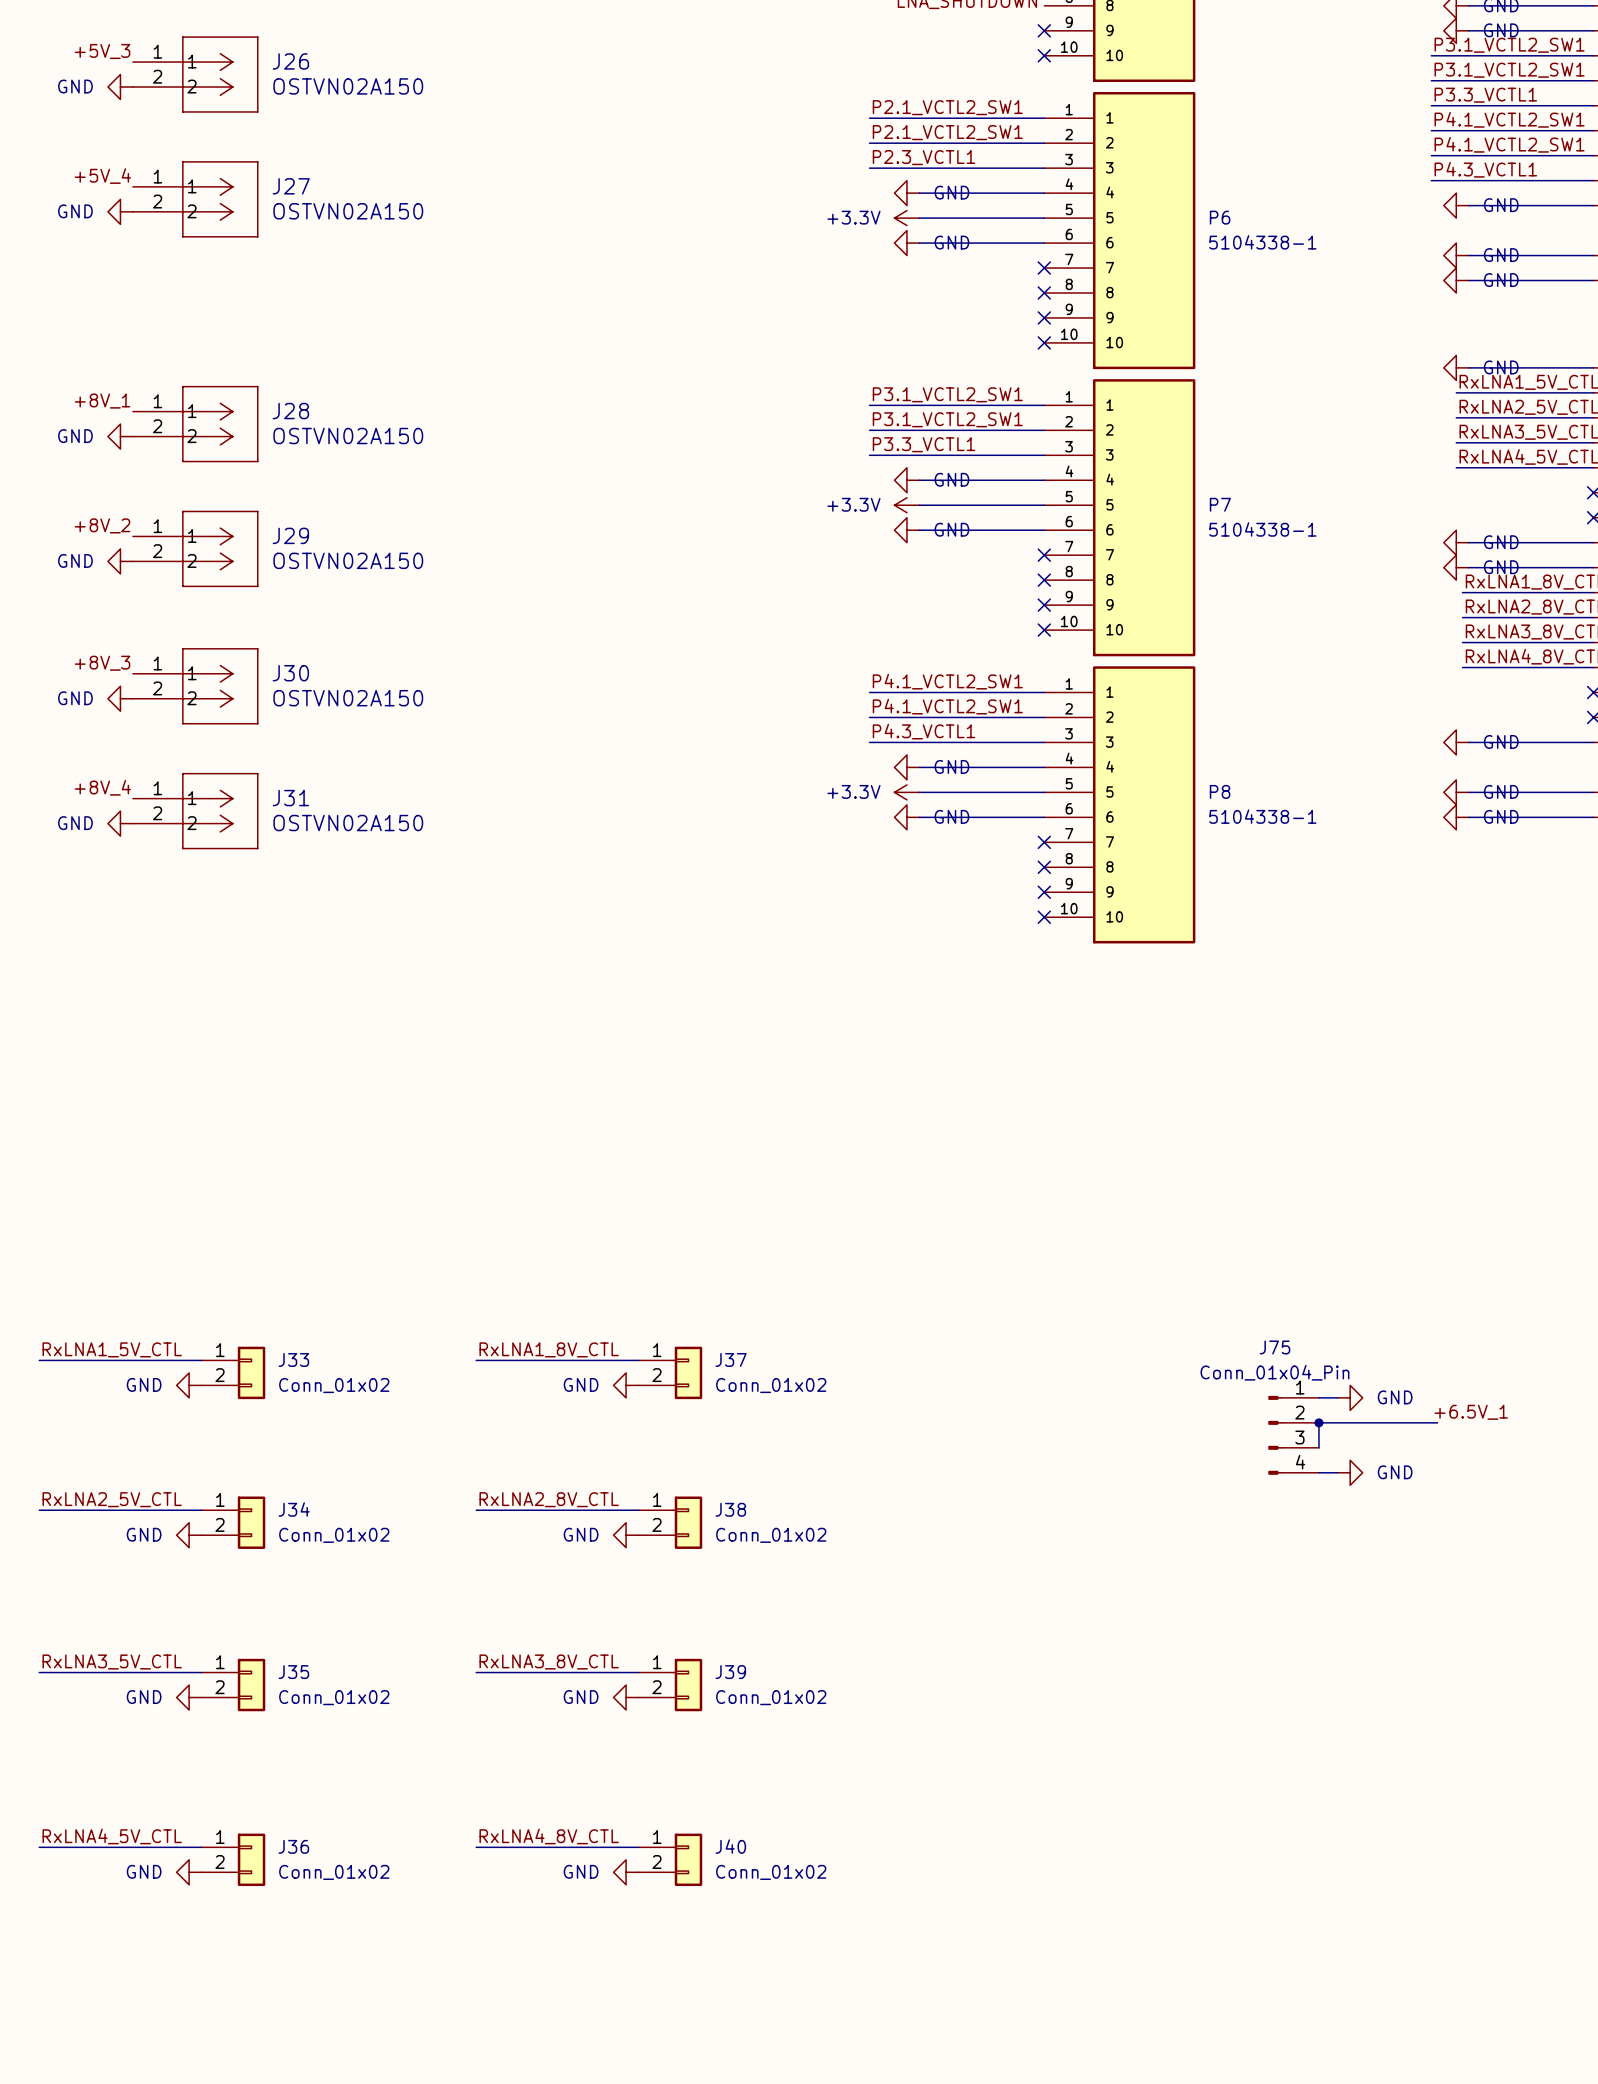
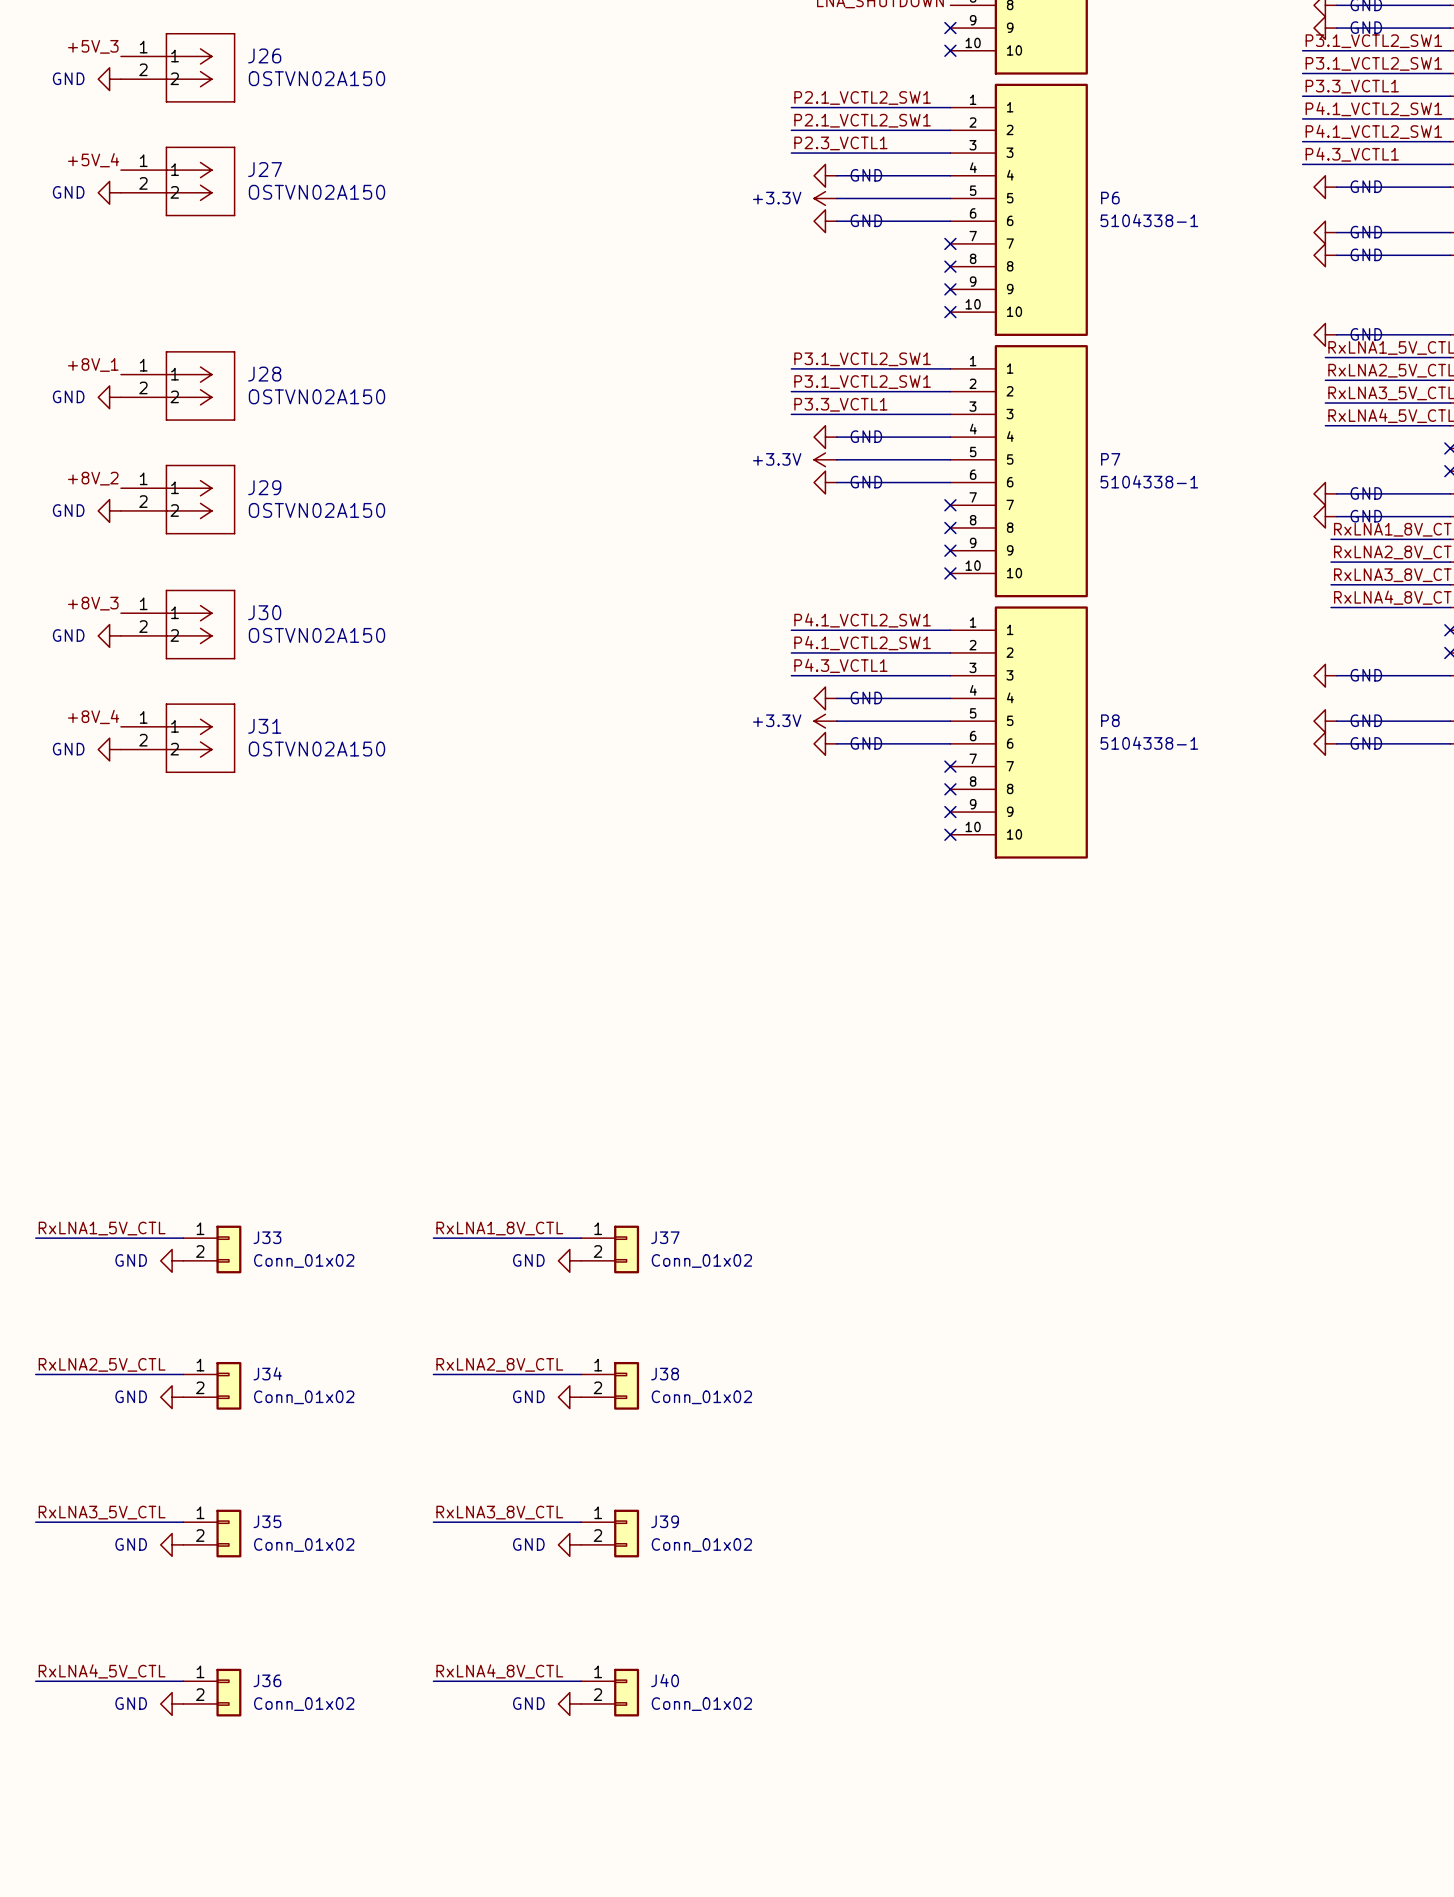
wire: (1318, 1397) (1337, 1397) -> none
power symbol: GND (1350, 1397) -> none
label: +6.5V_1 (1471, 1412) -> none
junction: (1318, 1422) -> none
wire: (1437, 1422) (1318, 1422) (1318, 1447) -> none
J75: Conn_01x04_Pin (1293, 1435) -> none
wire: (1318, 1472) (1337, 1472) -> none
power symbol: GND (1350, 1472) -> none

